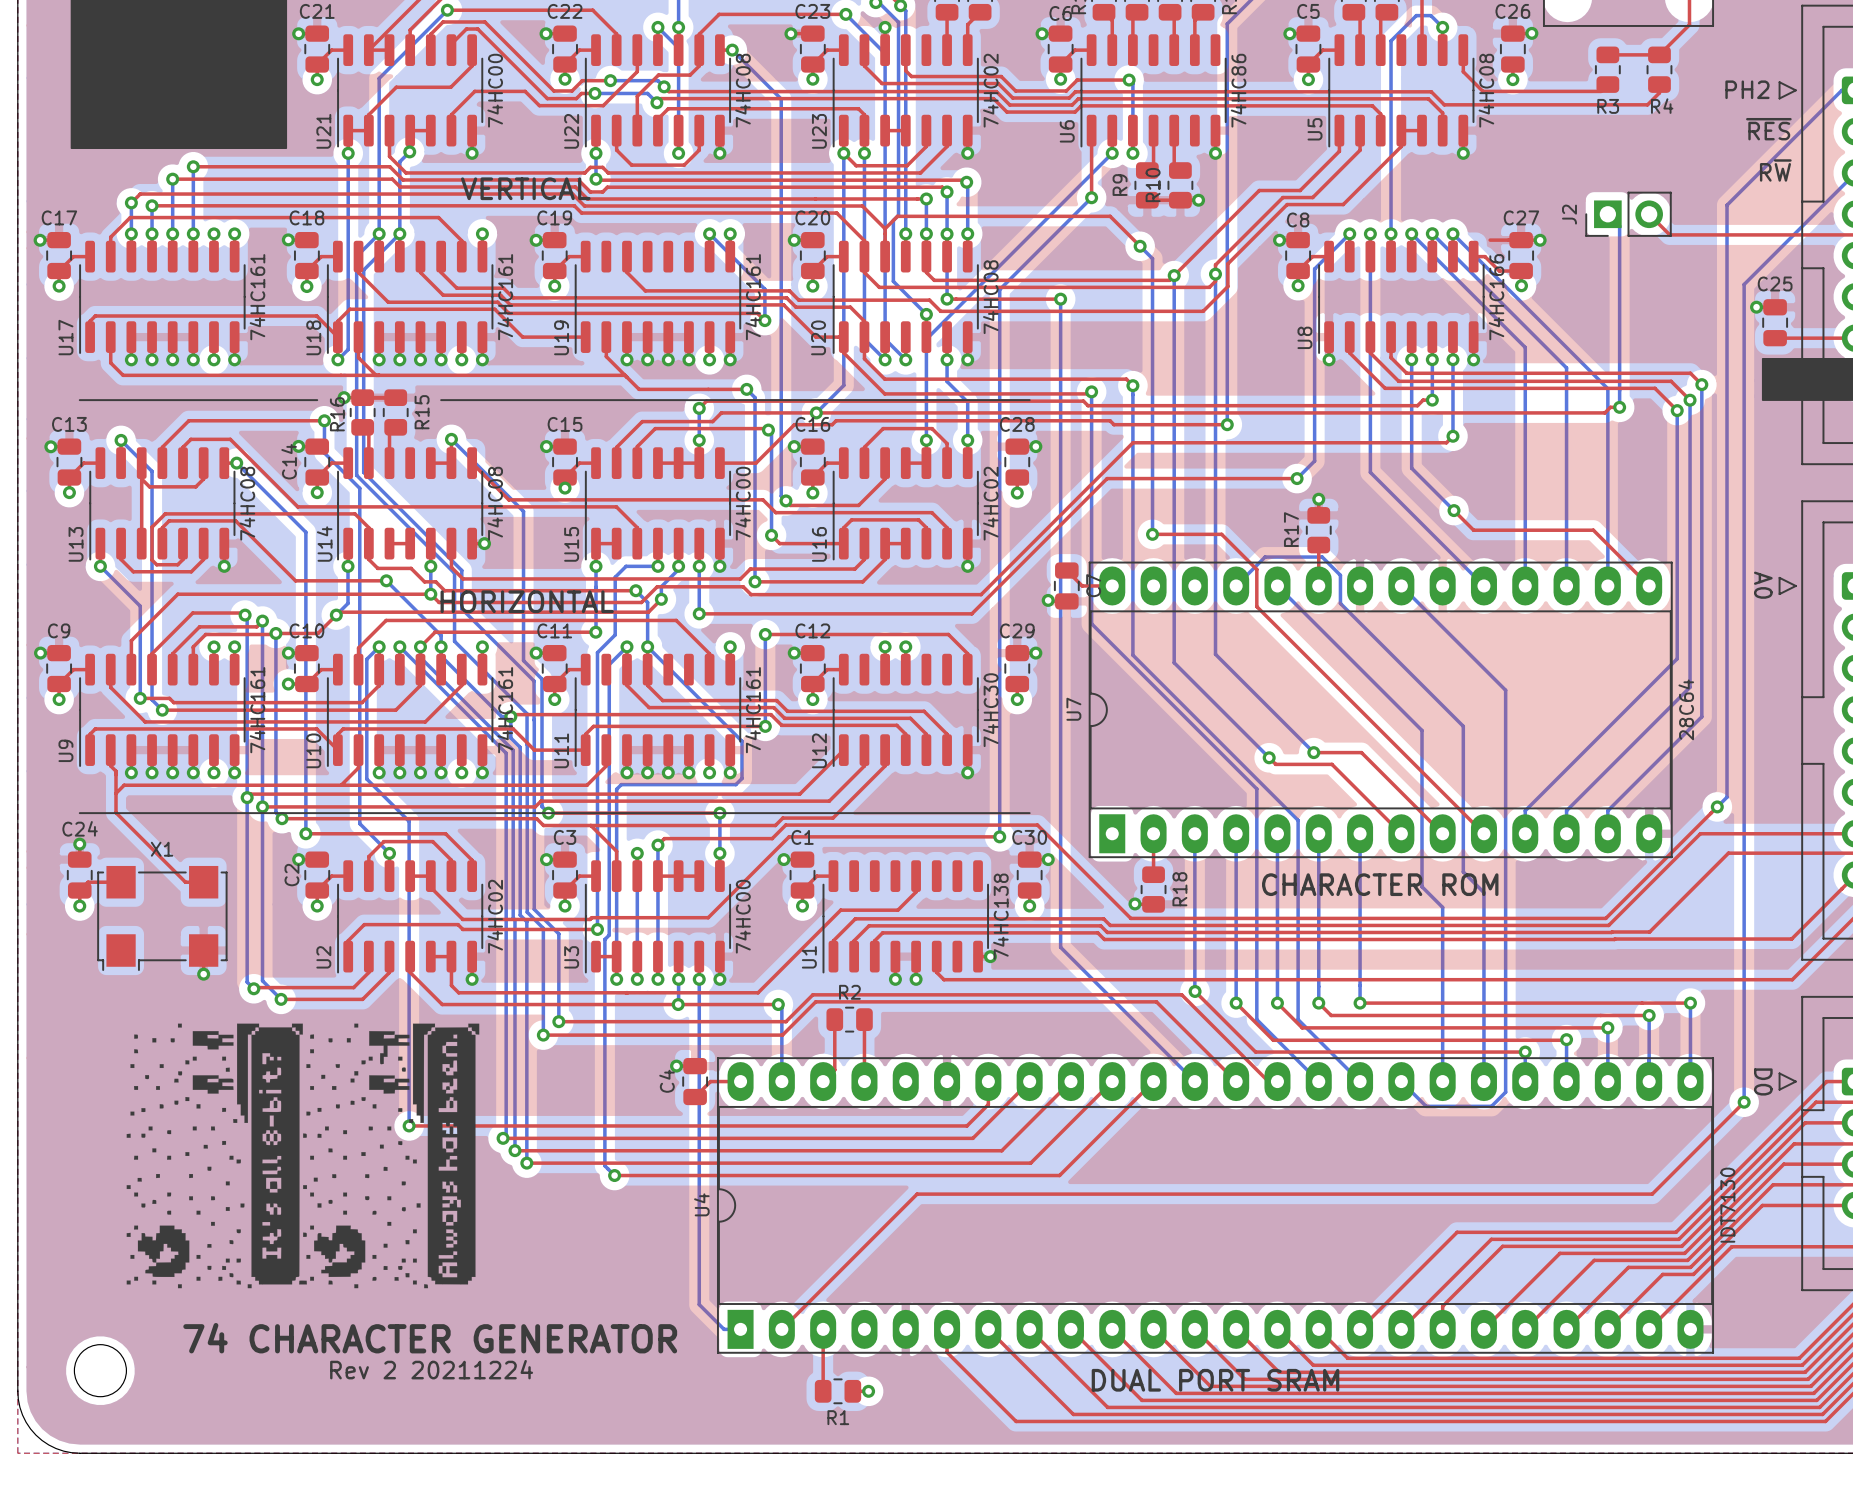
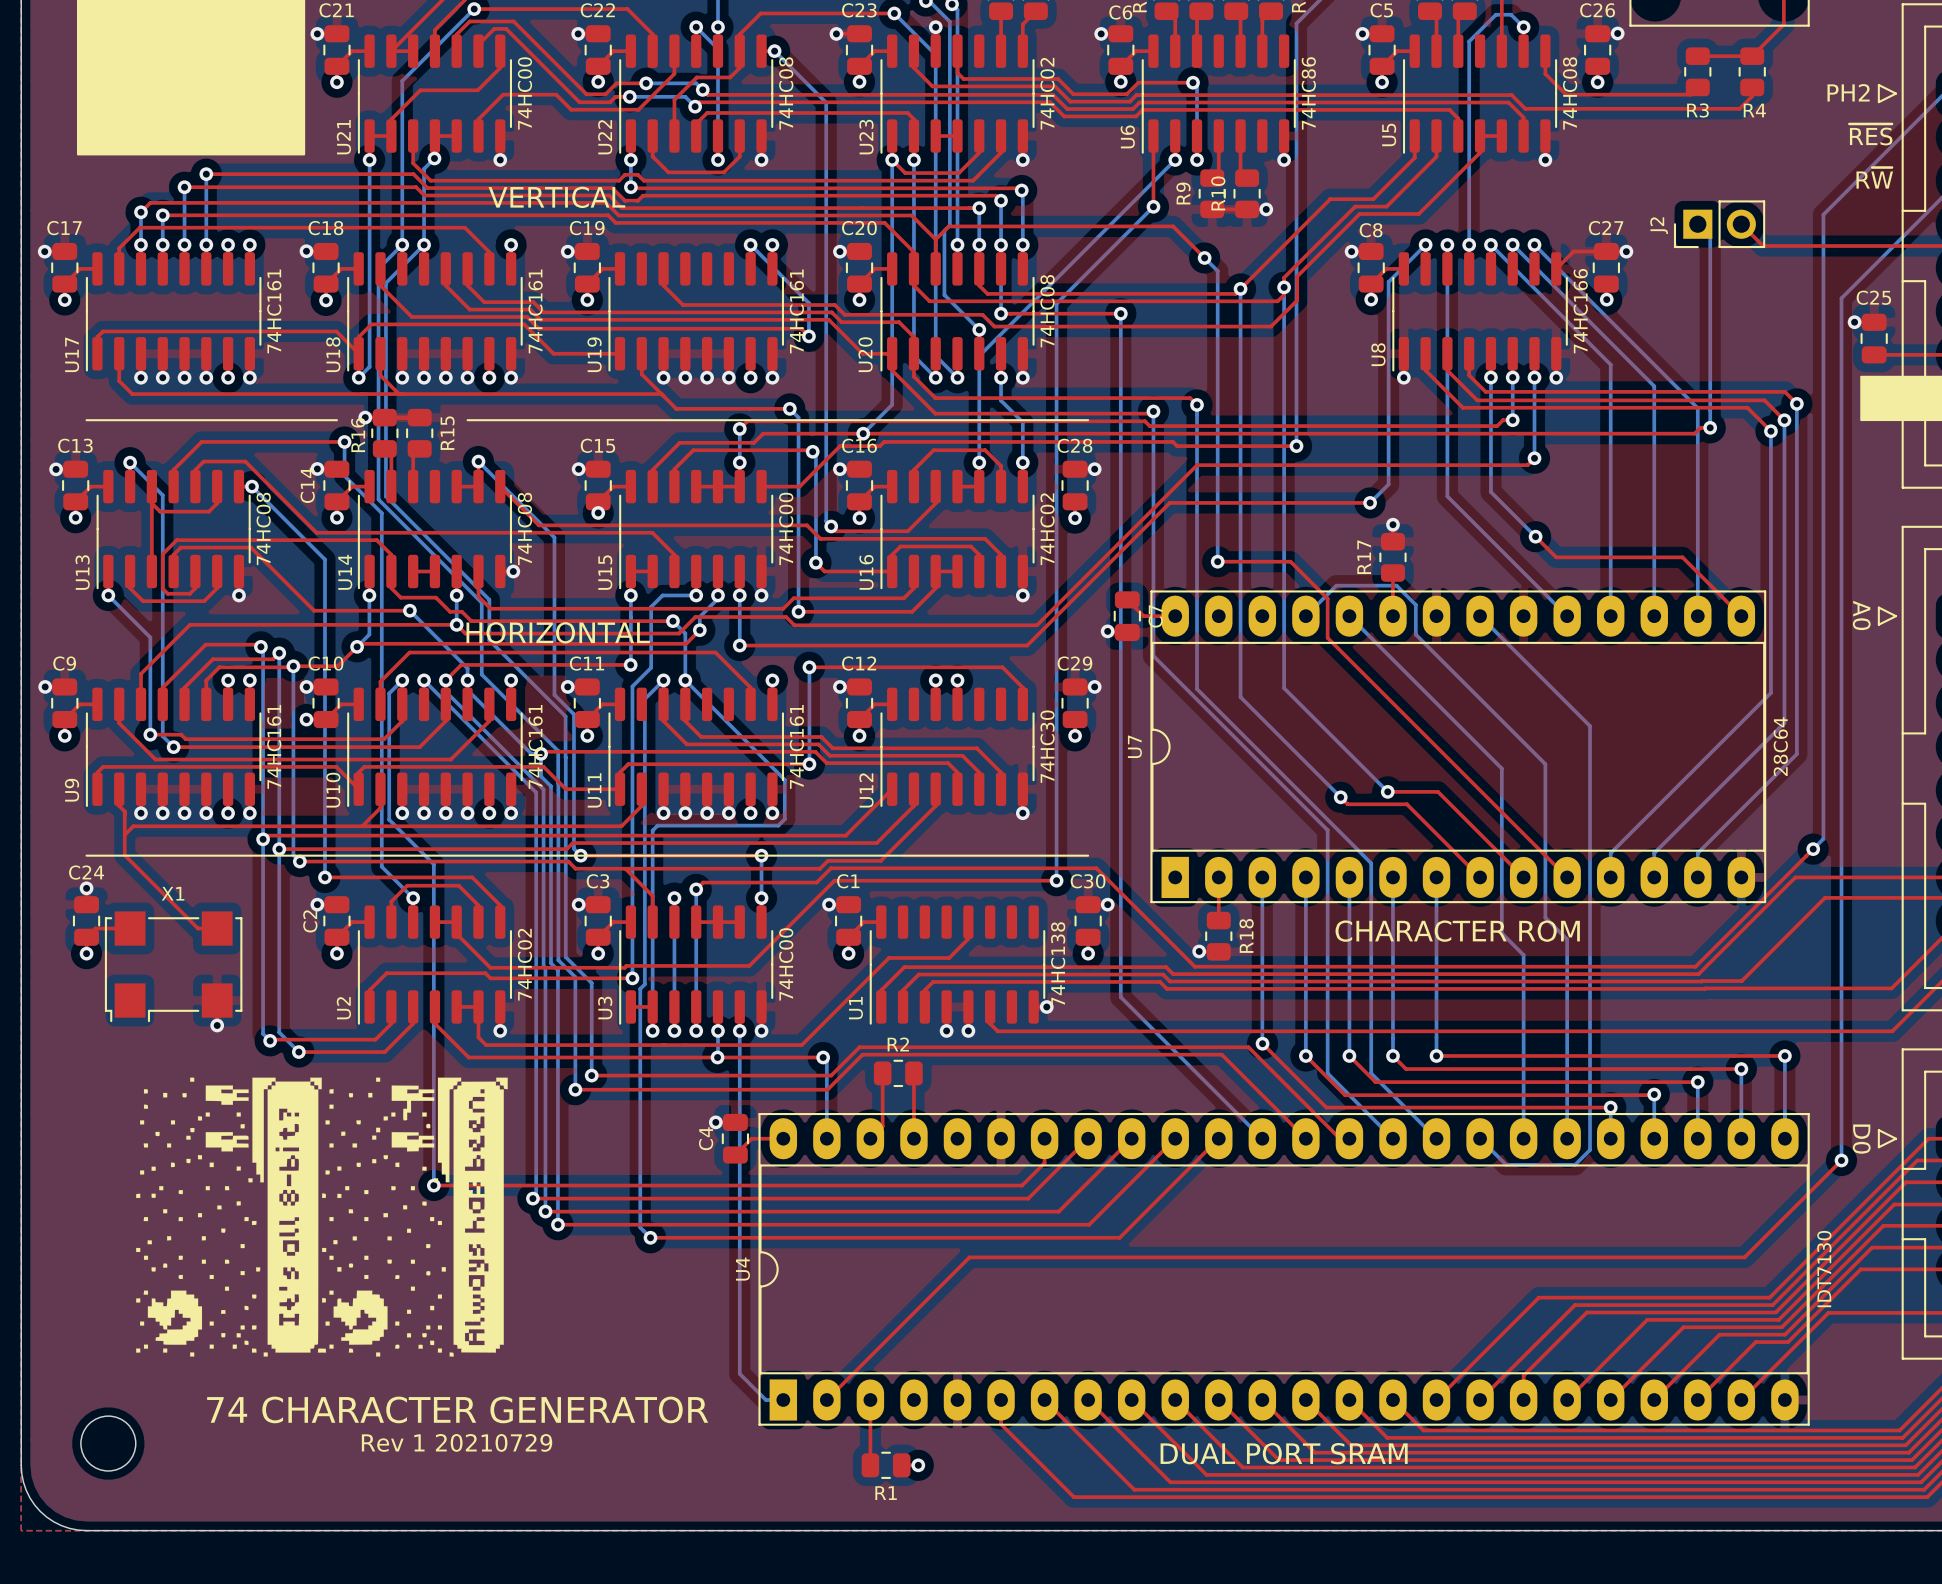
top track: (1473, 256) (1485, 256) (1499, 271) (1521, 271) -> (1556, 268) (1573, 251)
text: Rev 2 20211224 (431, 1369) -> Rev 1 20210729 (457, 1442)

